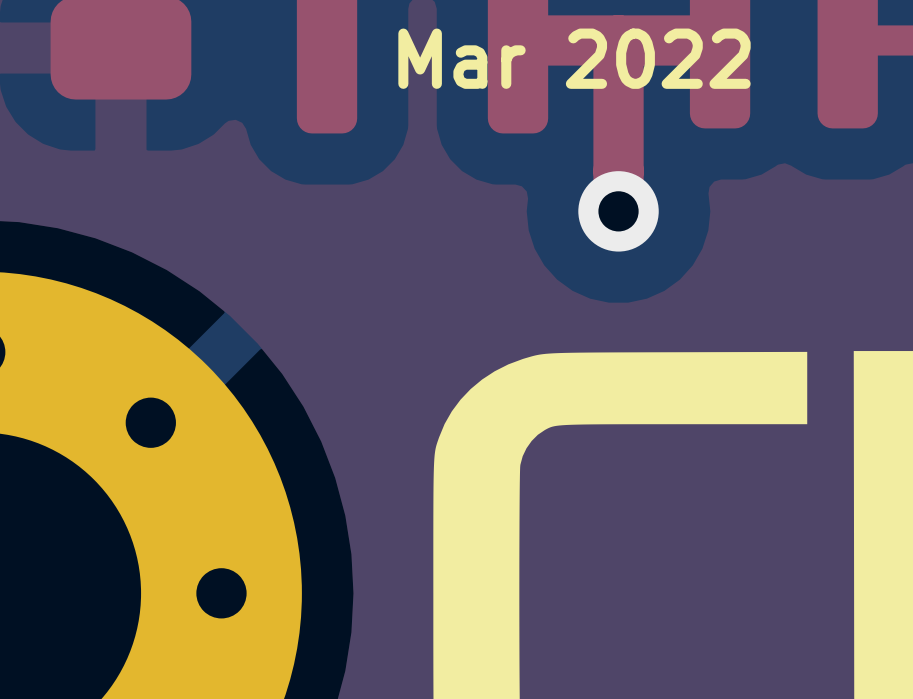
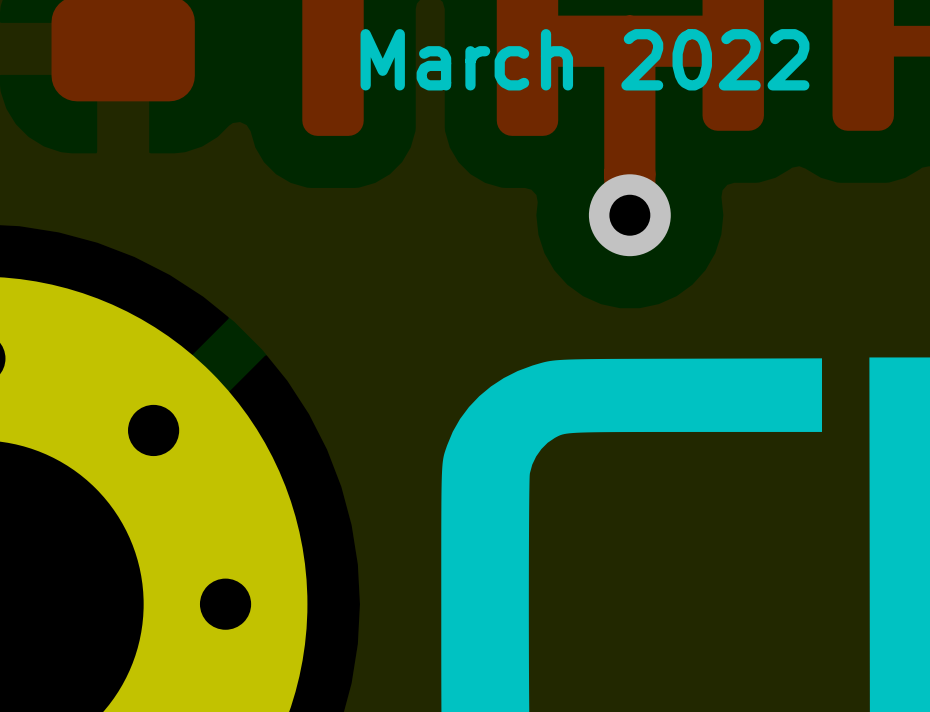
text: Mar 2022 (574, 58) -> March 2022 (585, 59)

